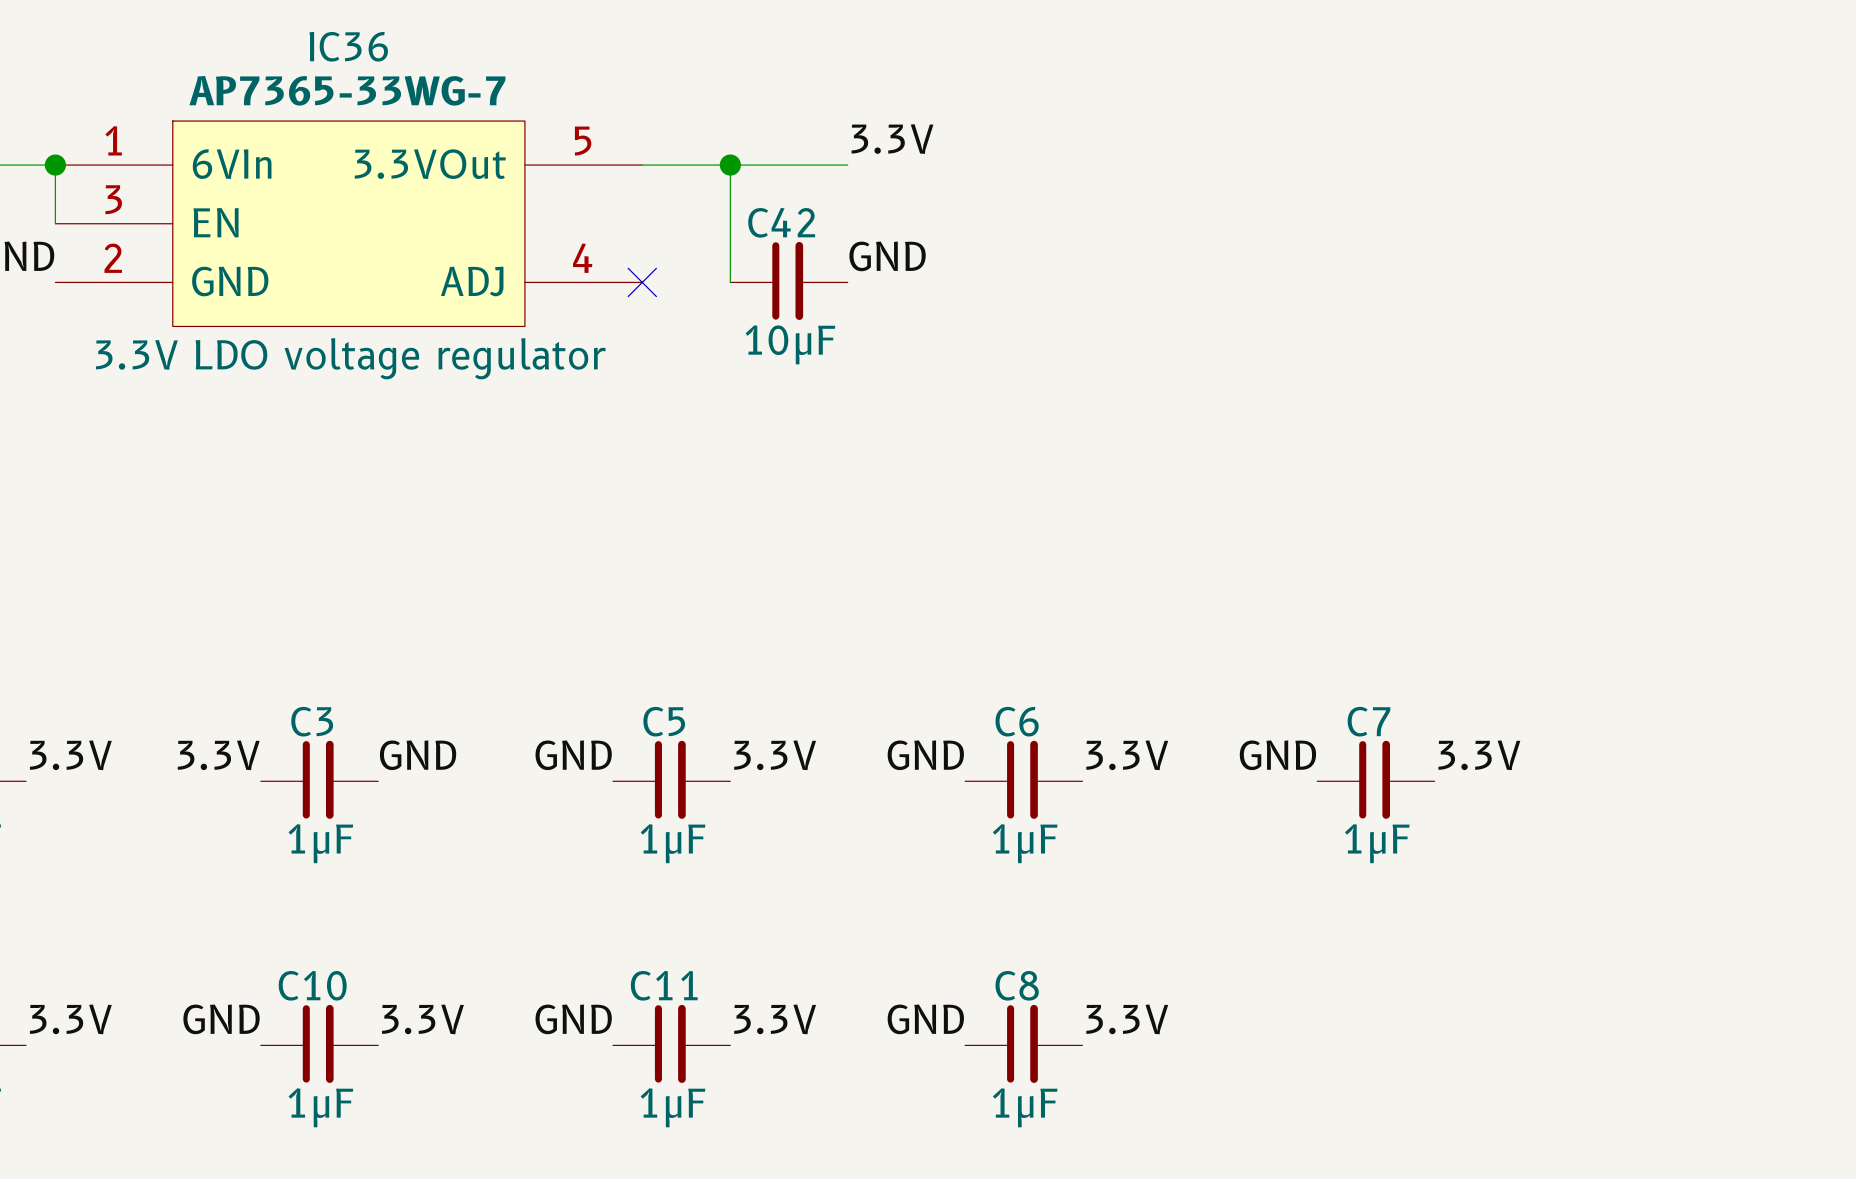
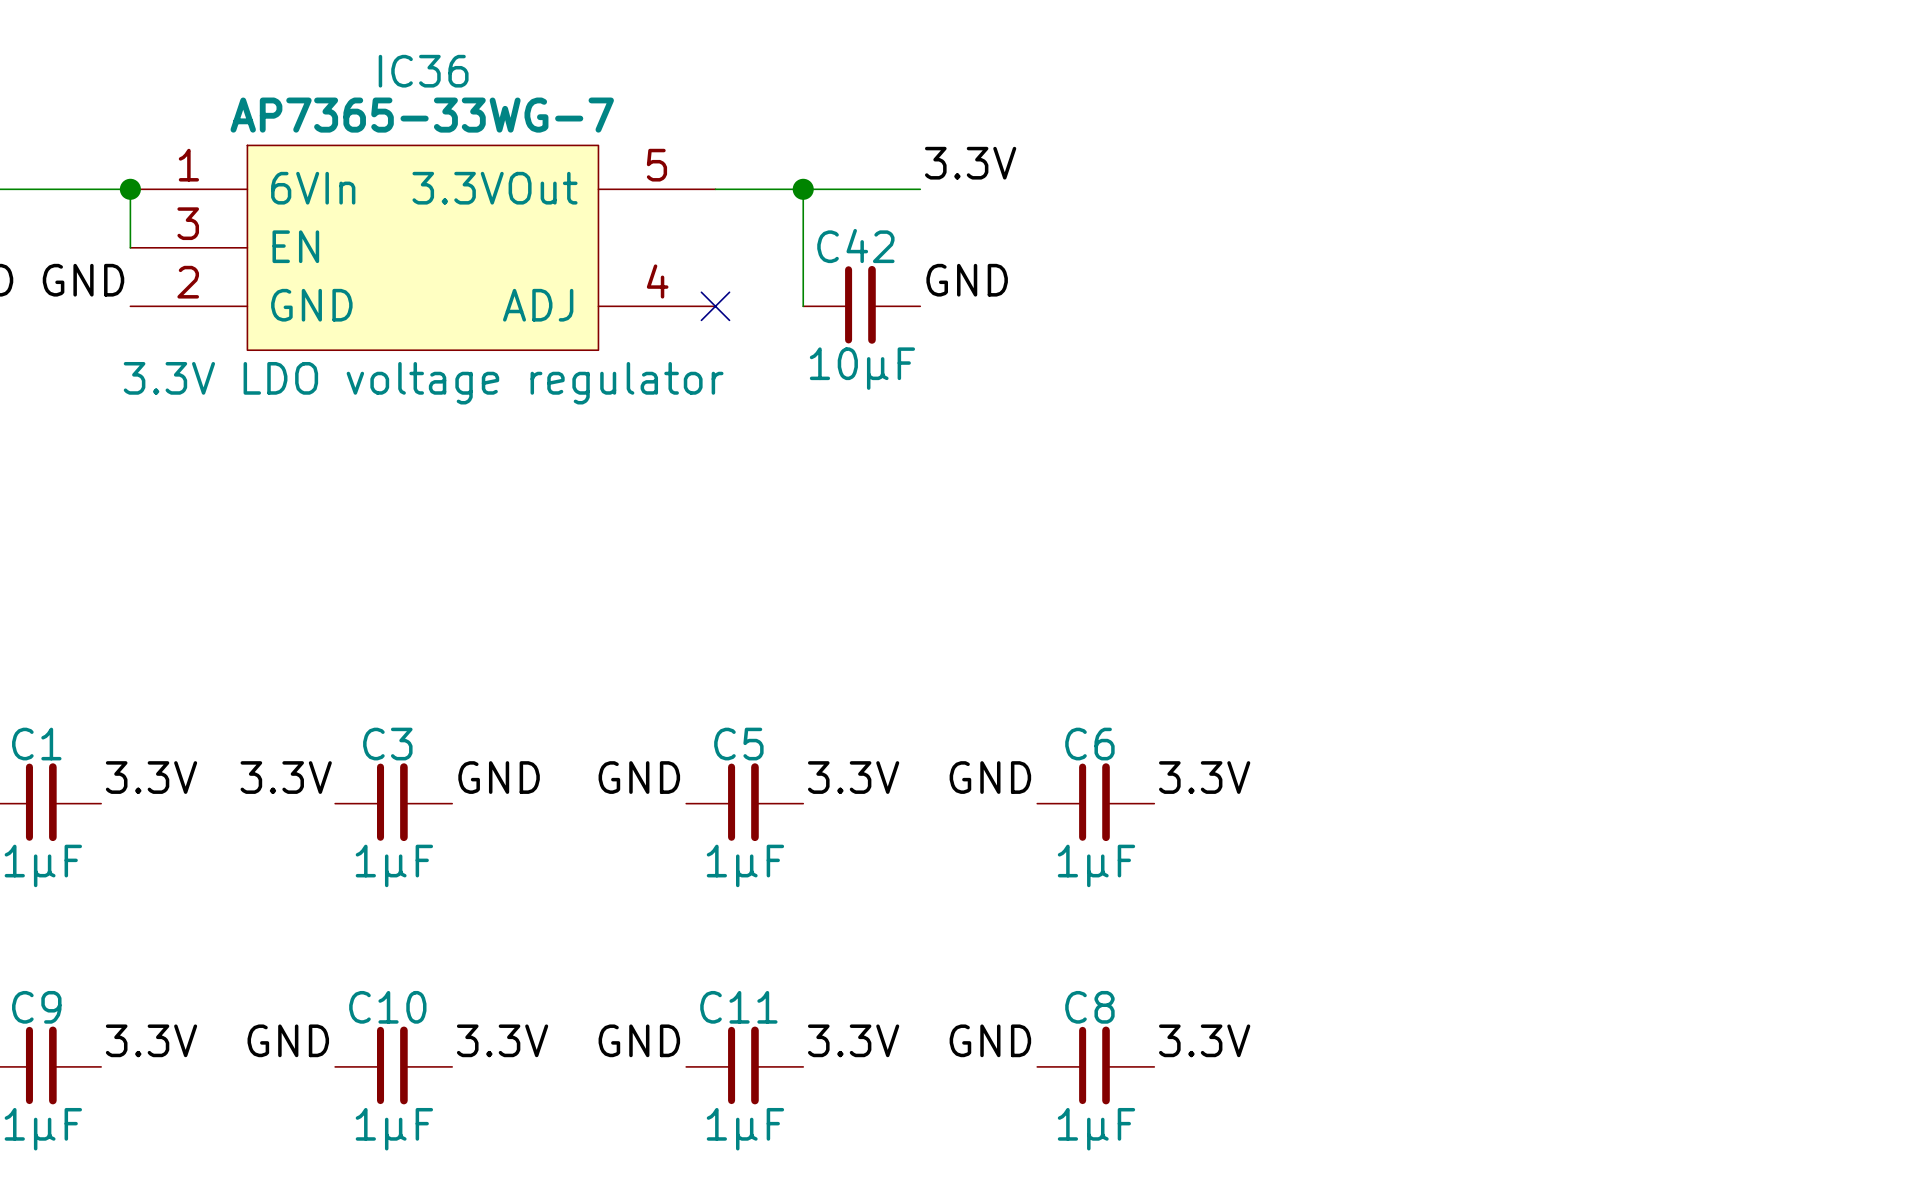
label: GND (1277, 755) -> none
label: 3.3V (1479, 755) -> none
C7: 1μF (1375, 779) -> none

